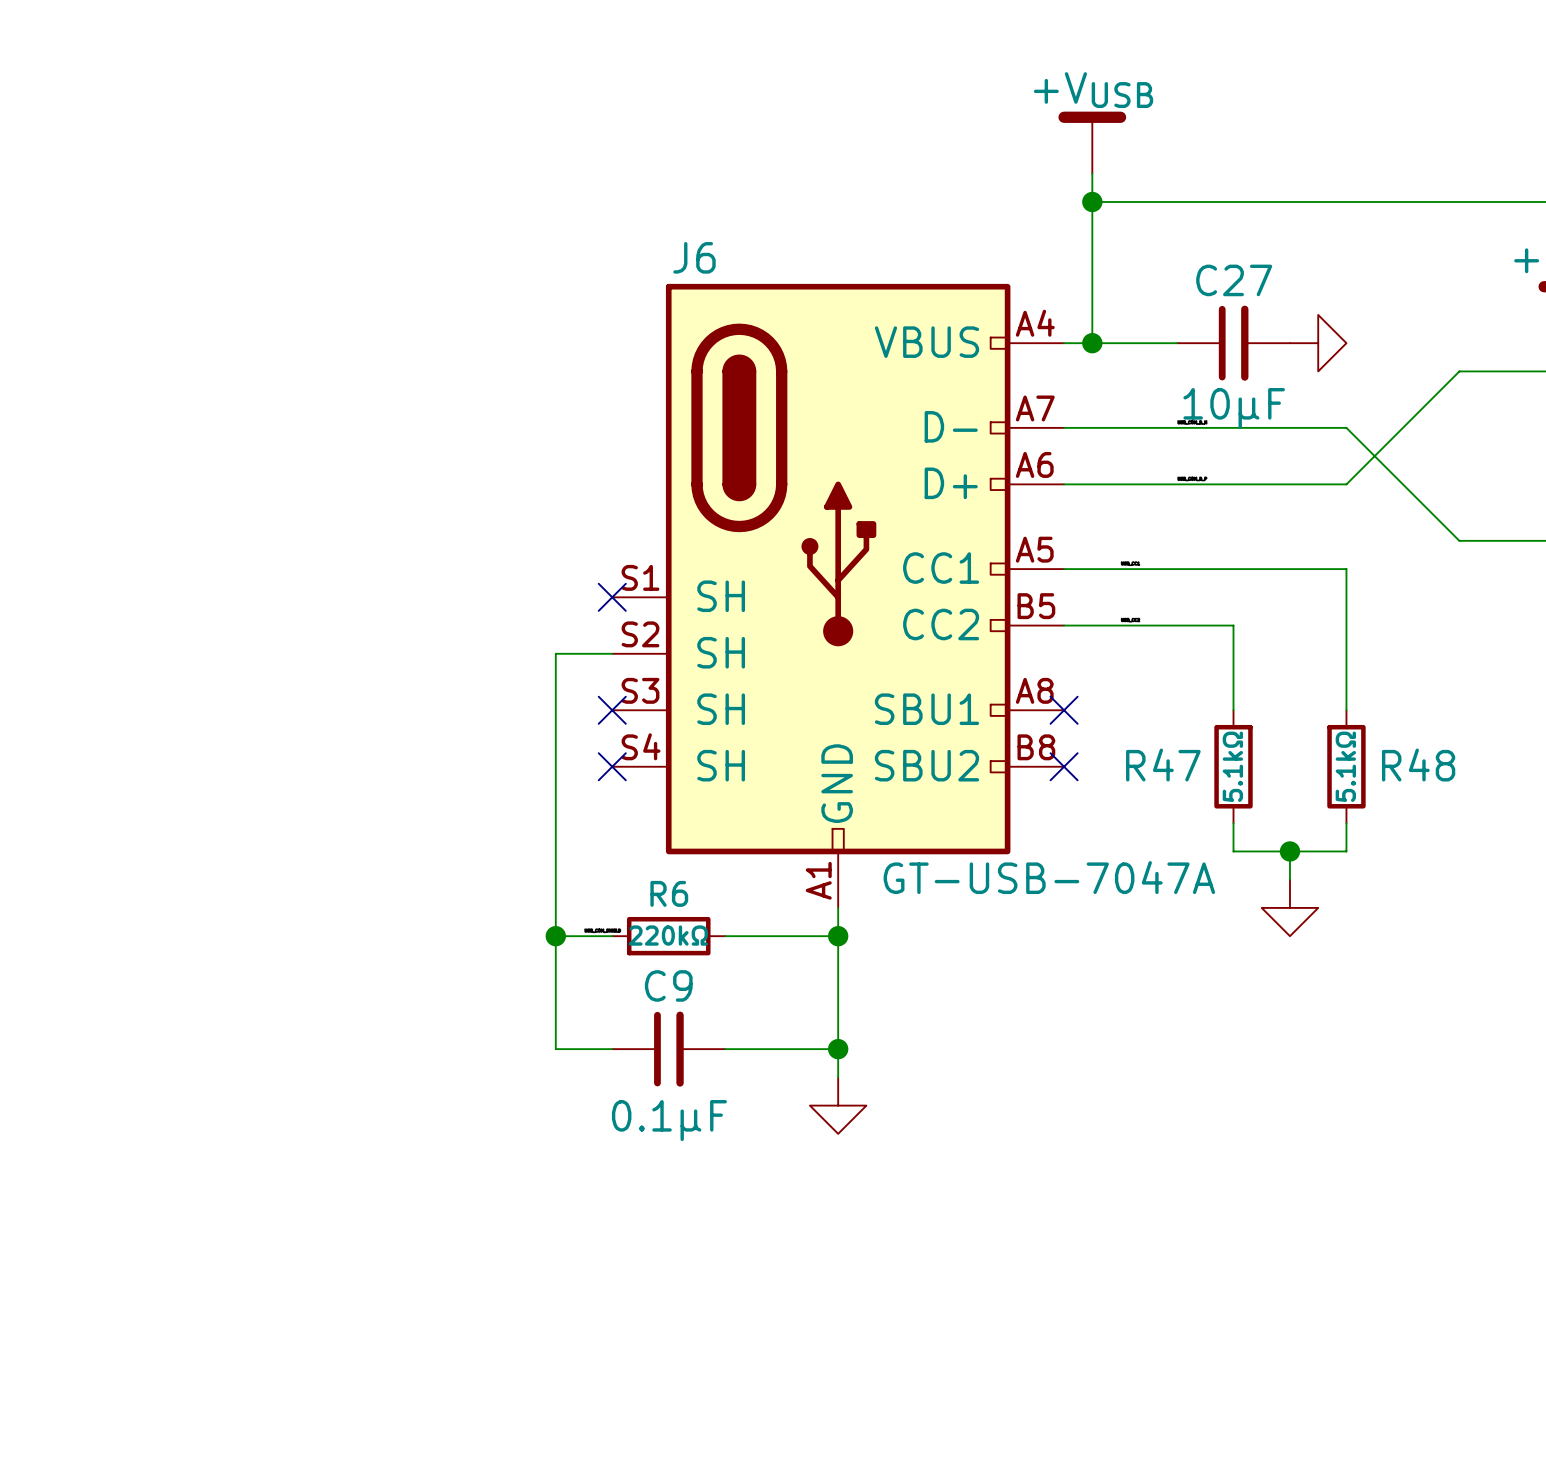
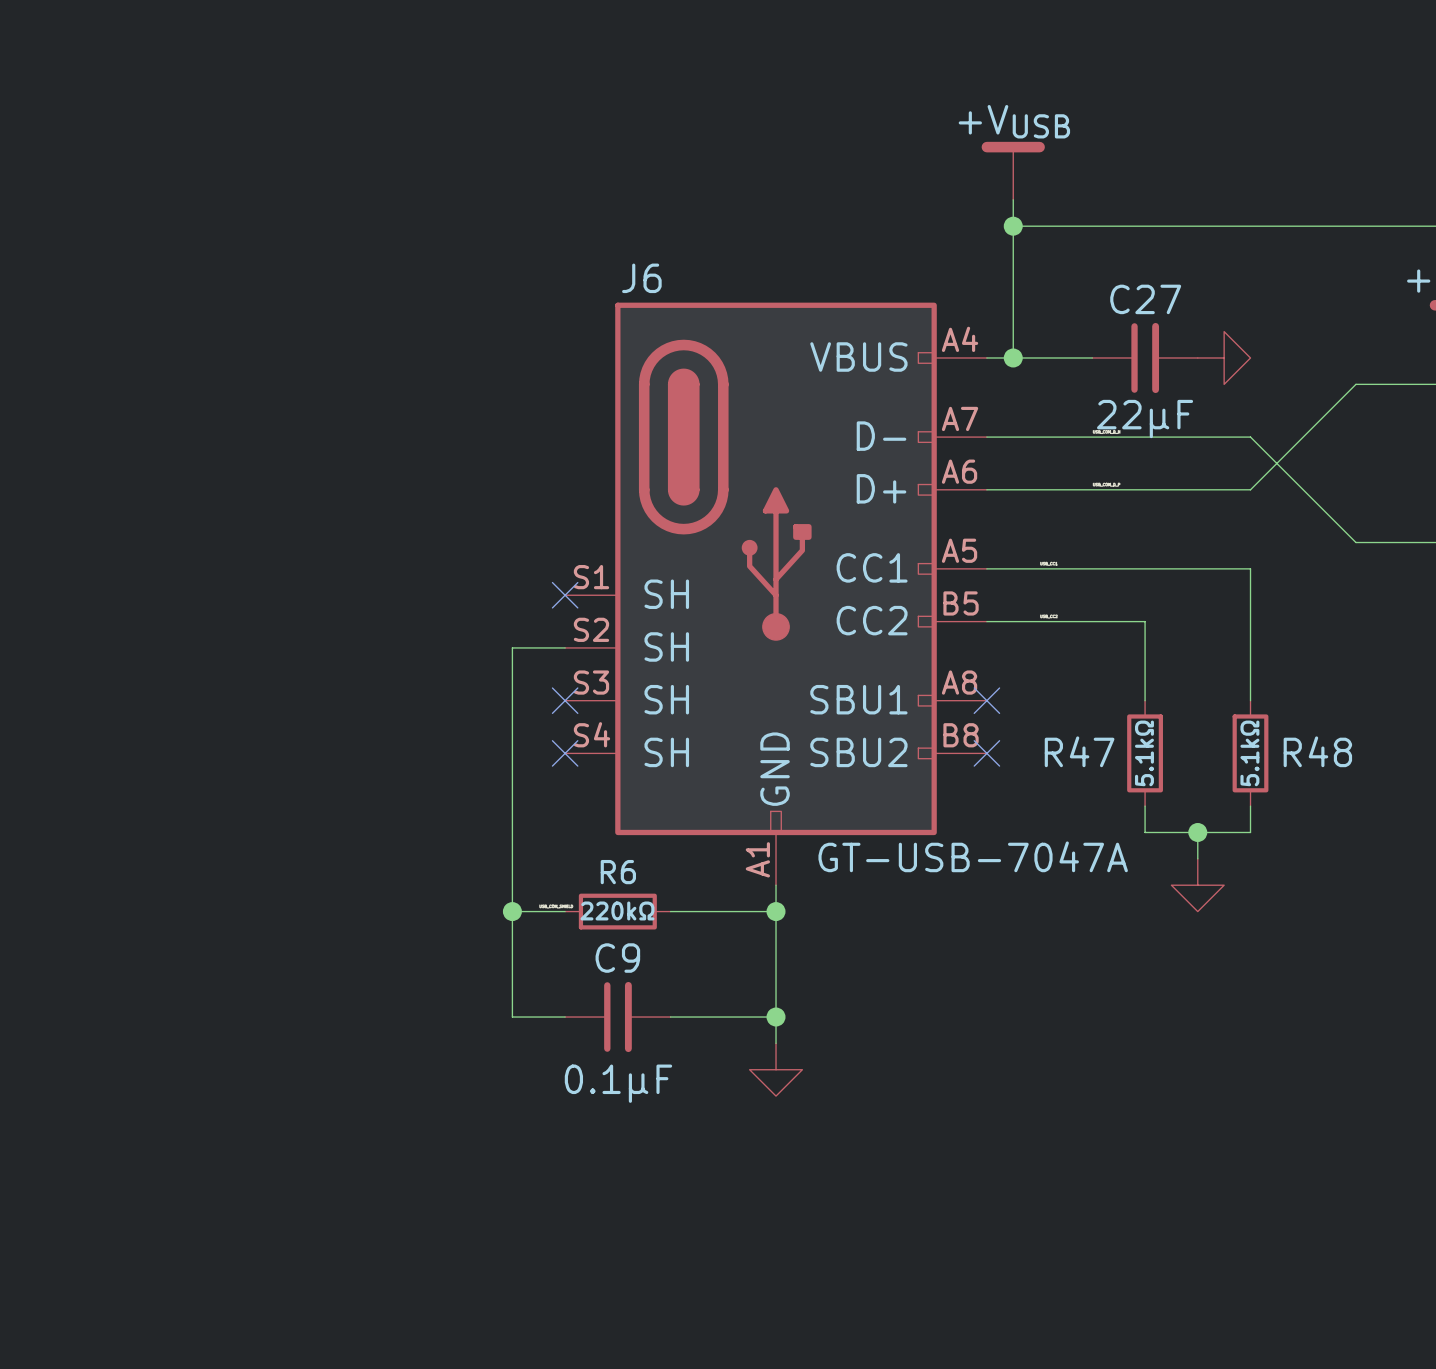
C27 value: 10µF (1234, 408) -> 22µF (1145, 419)

